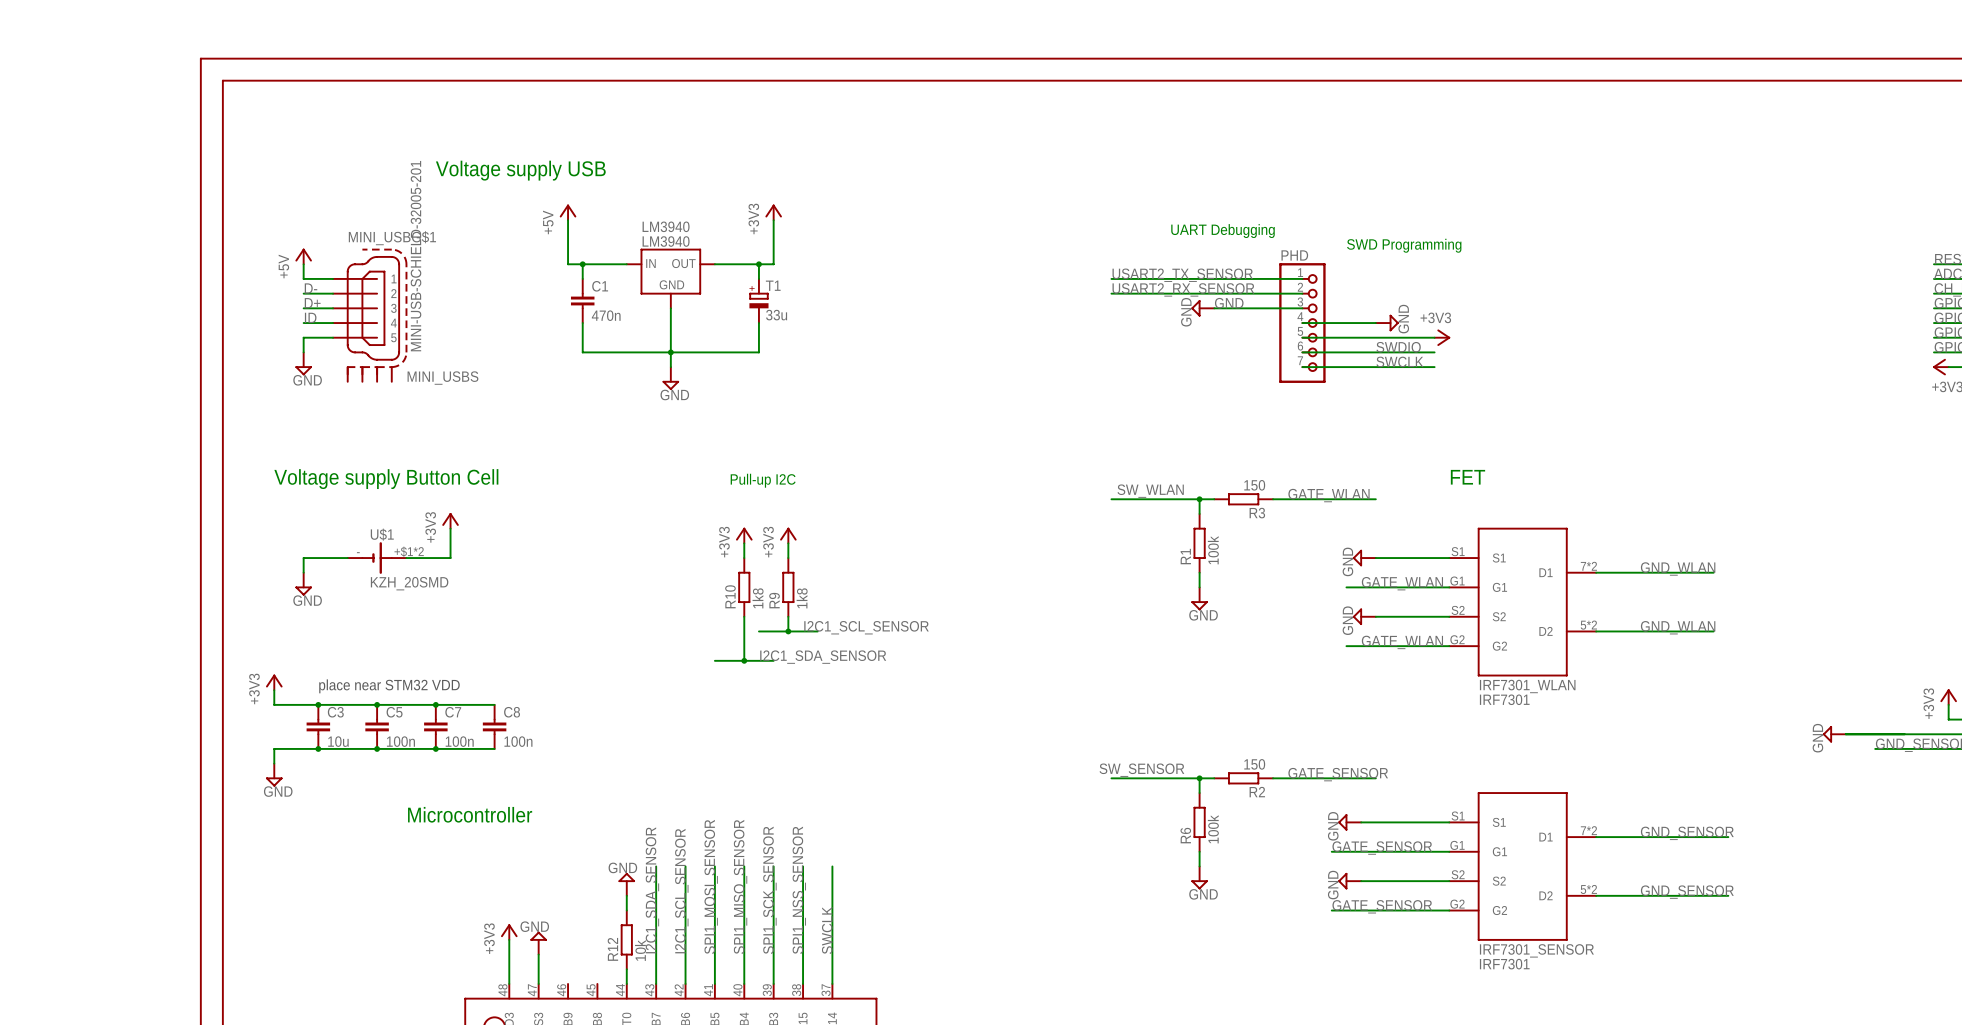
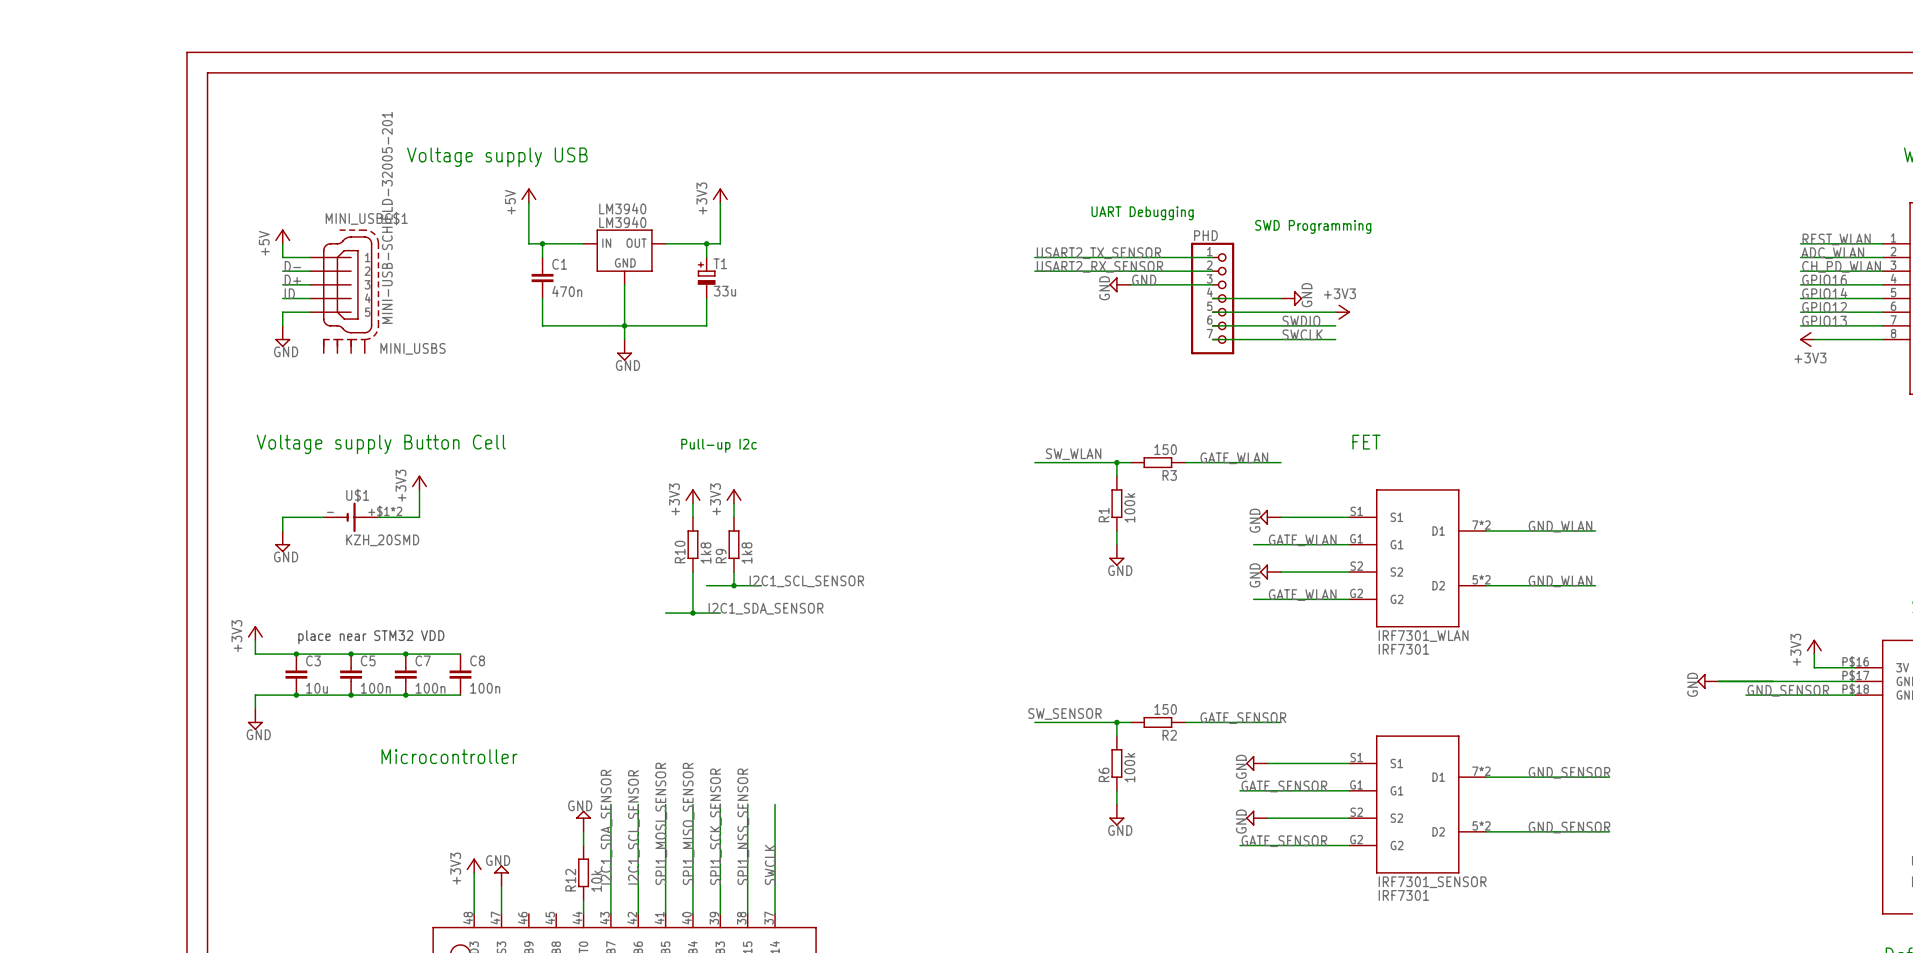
text: Pull-up I2C (763, 480) -> Pull-up I2c (718, 445)

